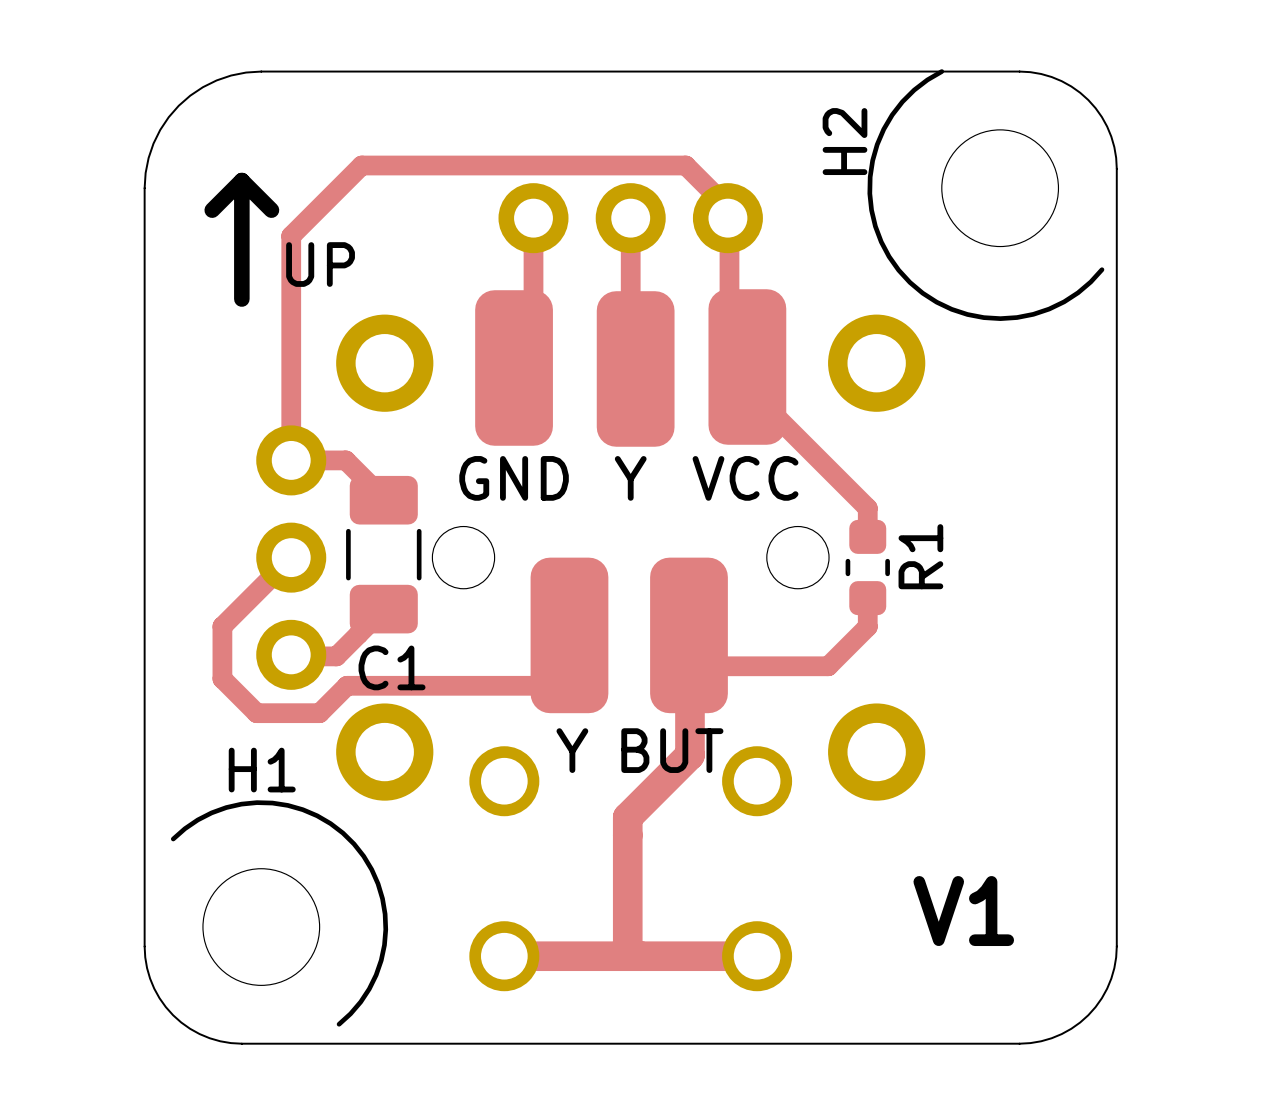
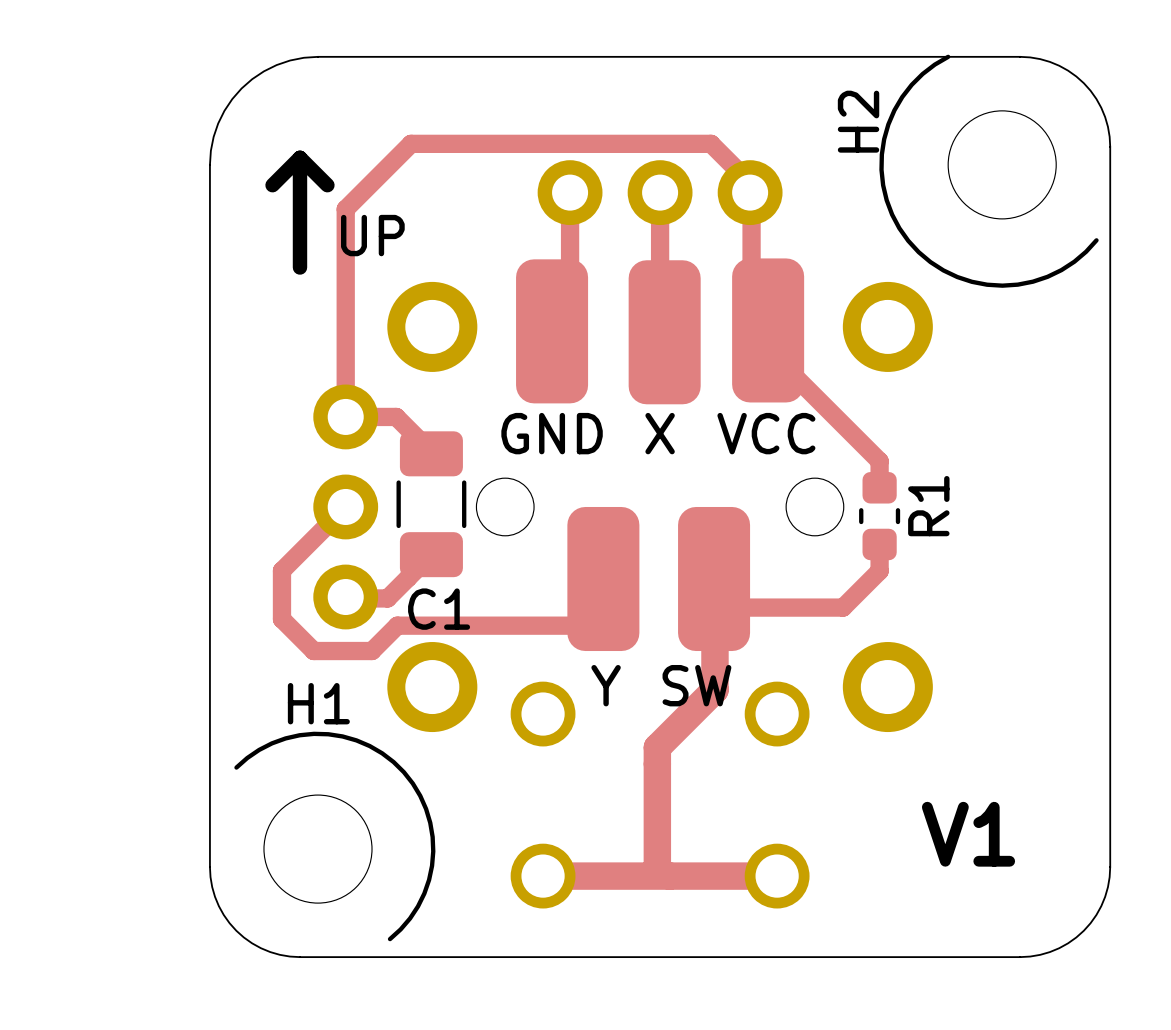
text: Y (630, 478) -> X (660, 433)
text: BUT (672, 750) -> SW (696, 685)

